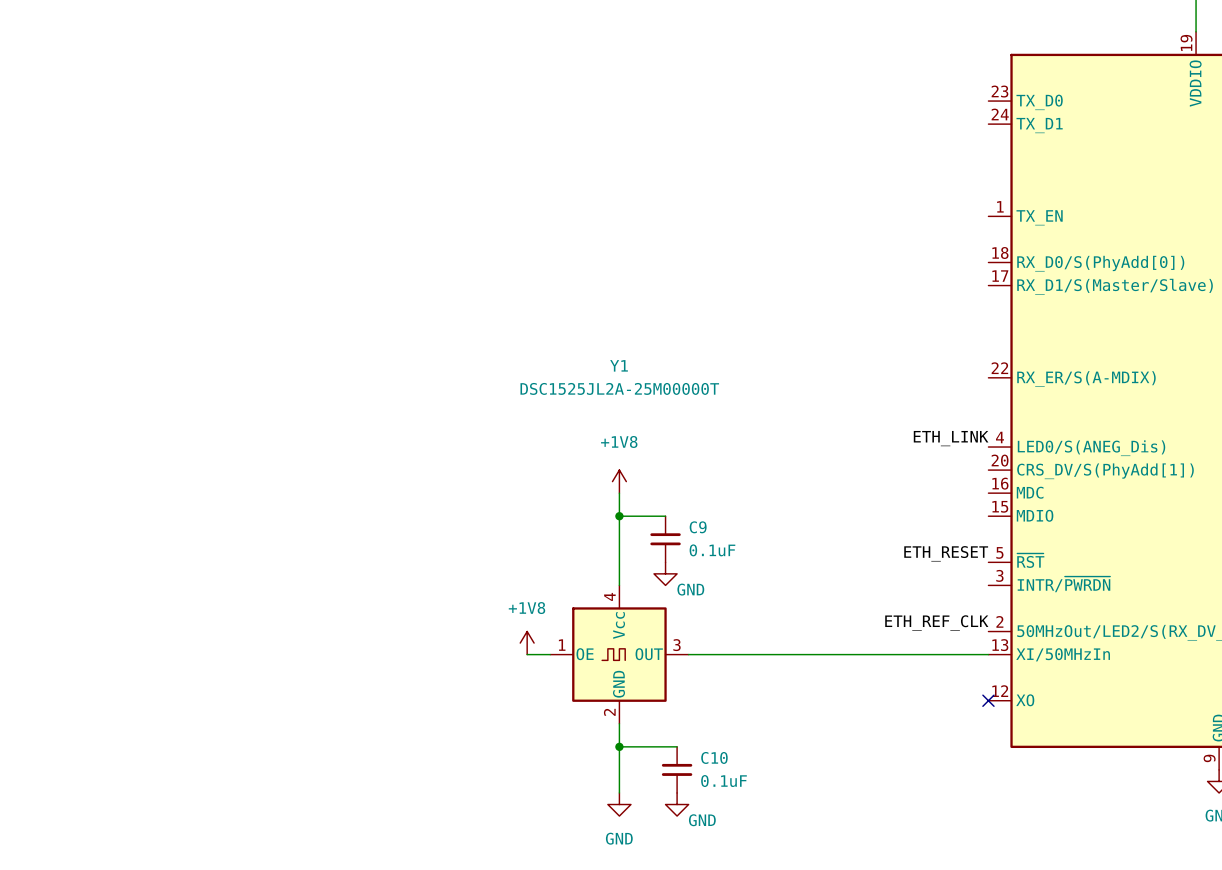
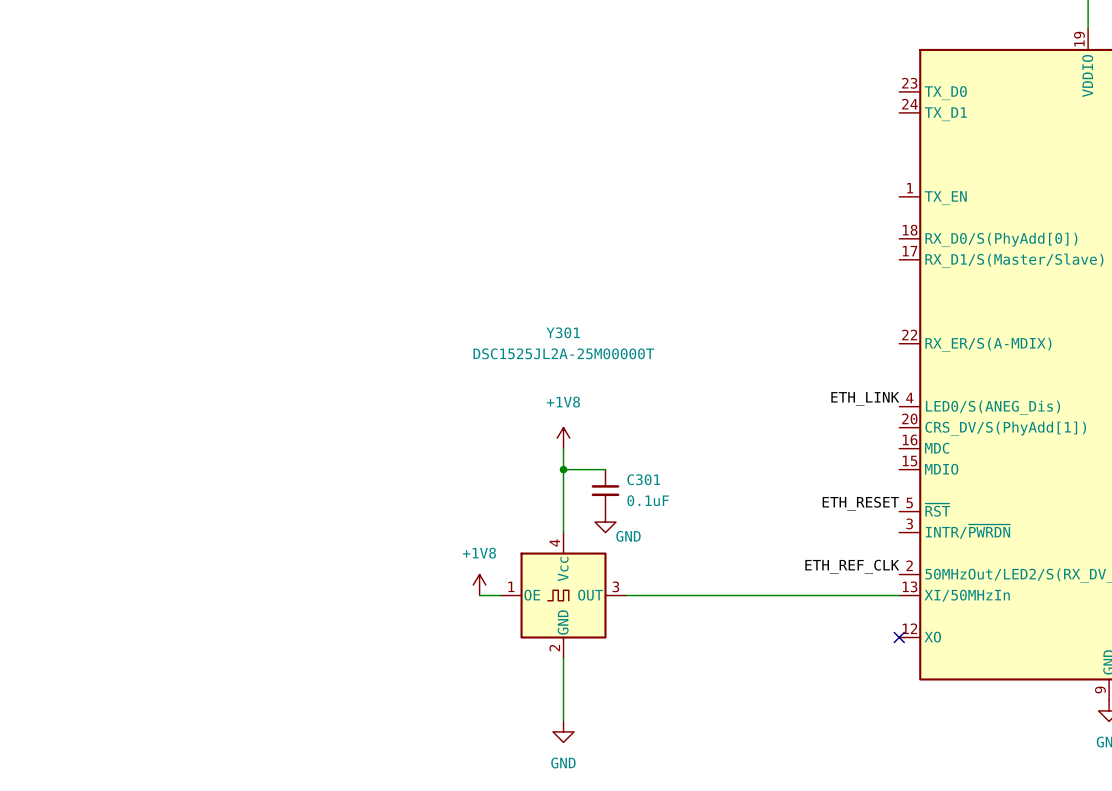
Y1 name: Y1 (619, 365) -> Y301 (563, 332)
C9 name: C9 (698, 527) -> C301 (643, 479)
wire: (619, 746) (677, 746) -> none
junction: (619, 746) -> none
C10: 0.1uF (677, 769) -> none
power symbol: GND (677, 804) -> none

